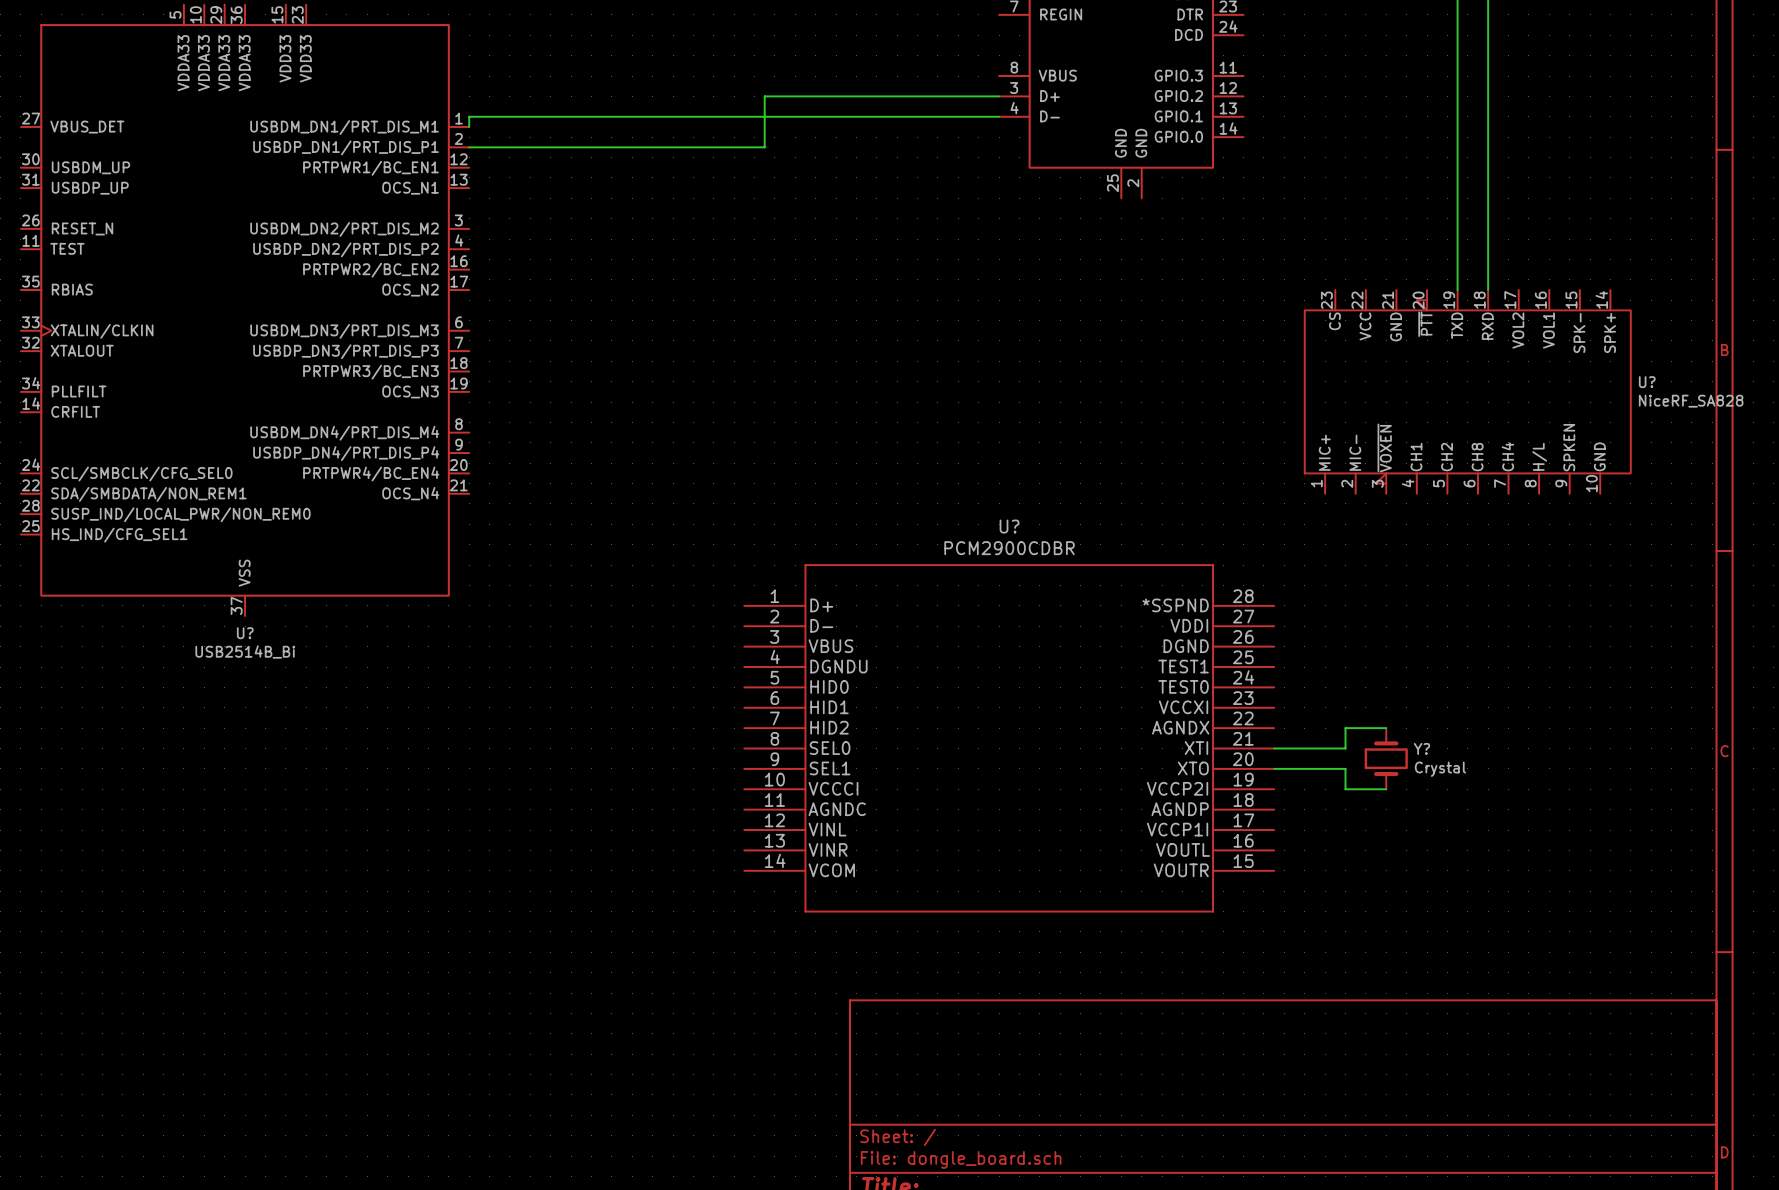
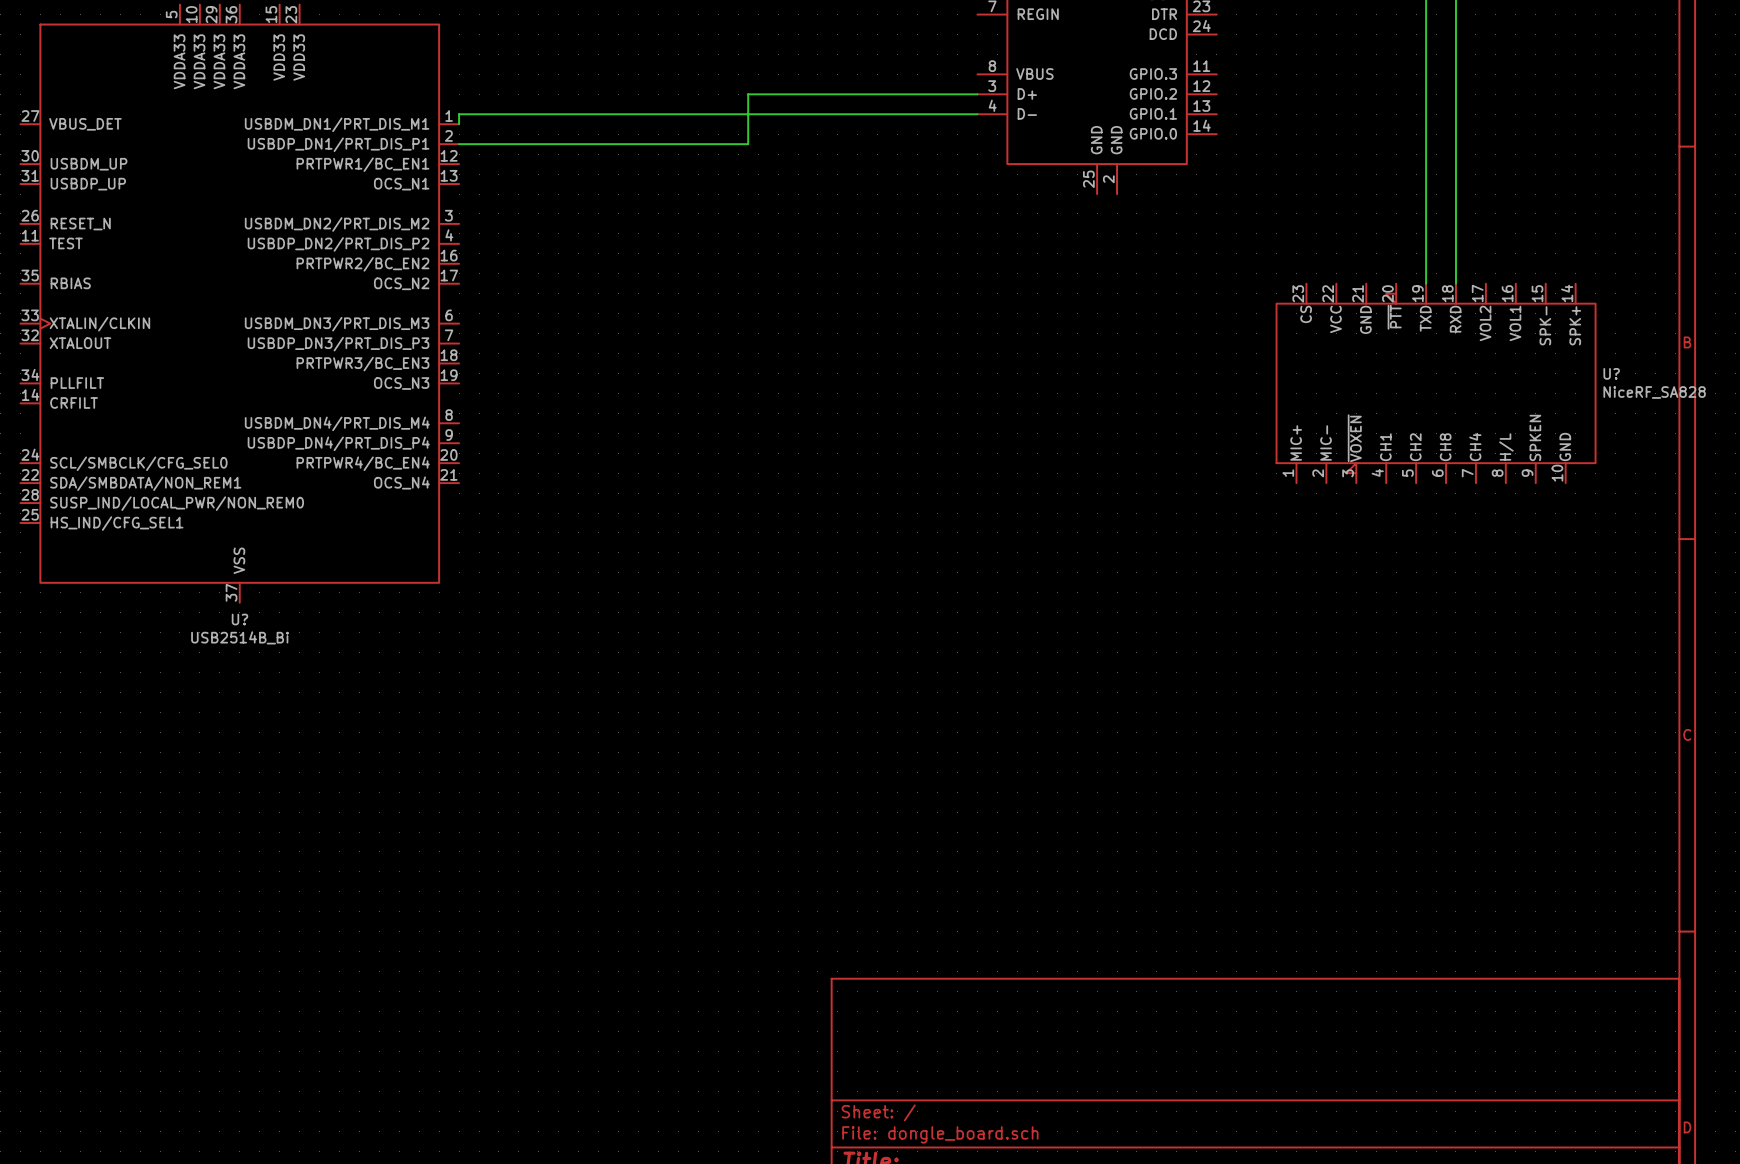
wire: (1386, 728) (1345, 728) (1345, 748) (1274, 748) -> none
U?: PCM2900CDBR (1009, 738) -> none
Y?: Crystal (1386, 758) -> none
wire: (1274, 768) (1345, 768) (1345, 789) (1386, 789) -> none

